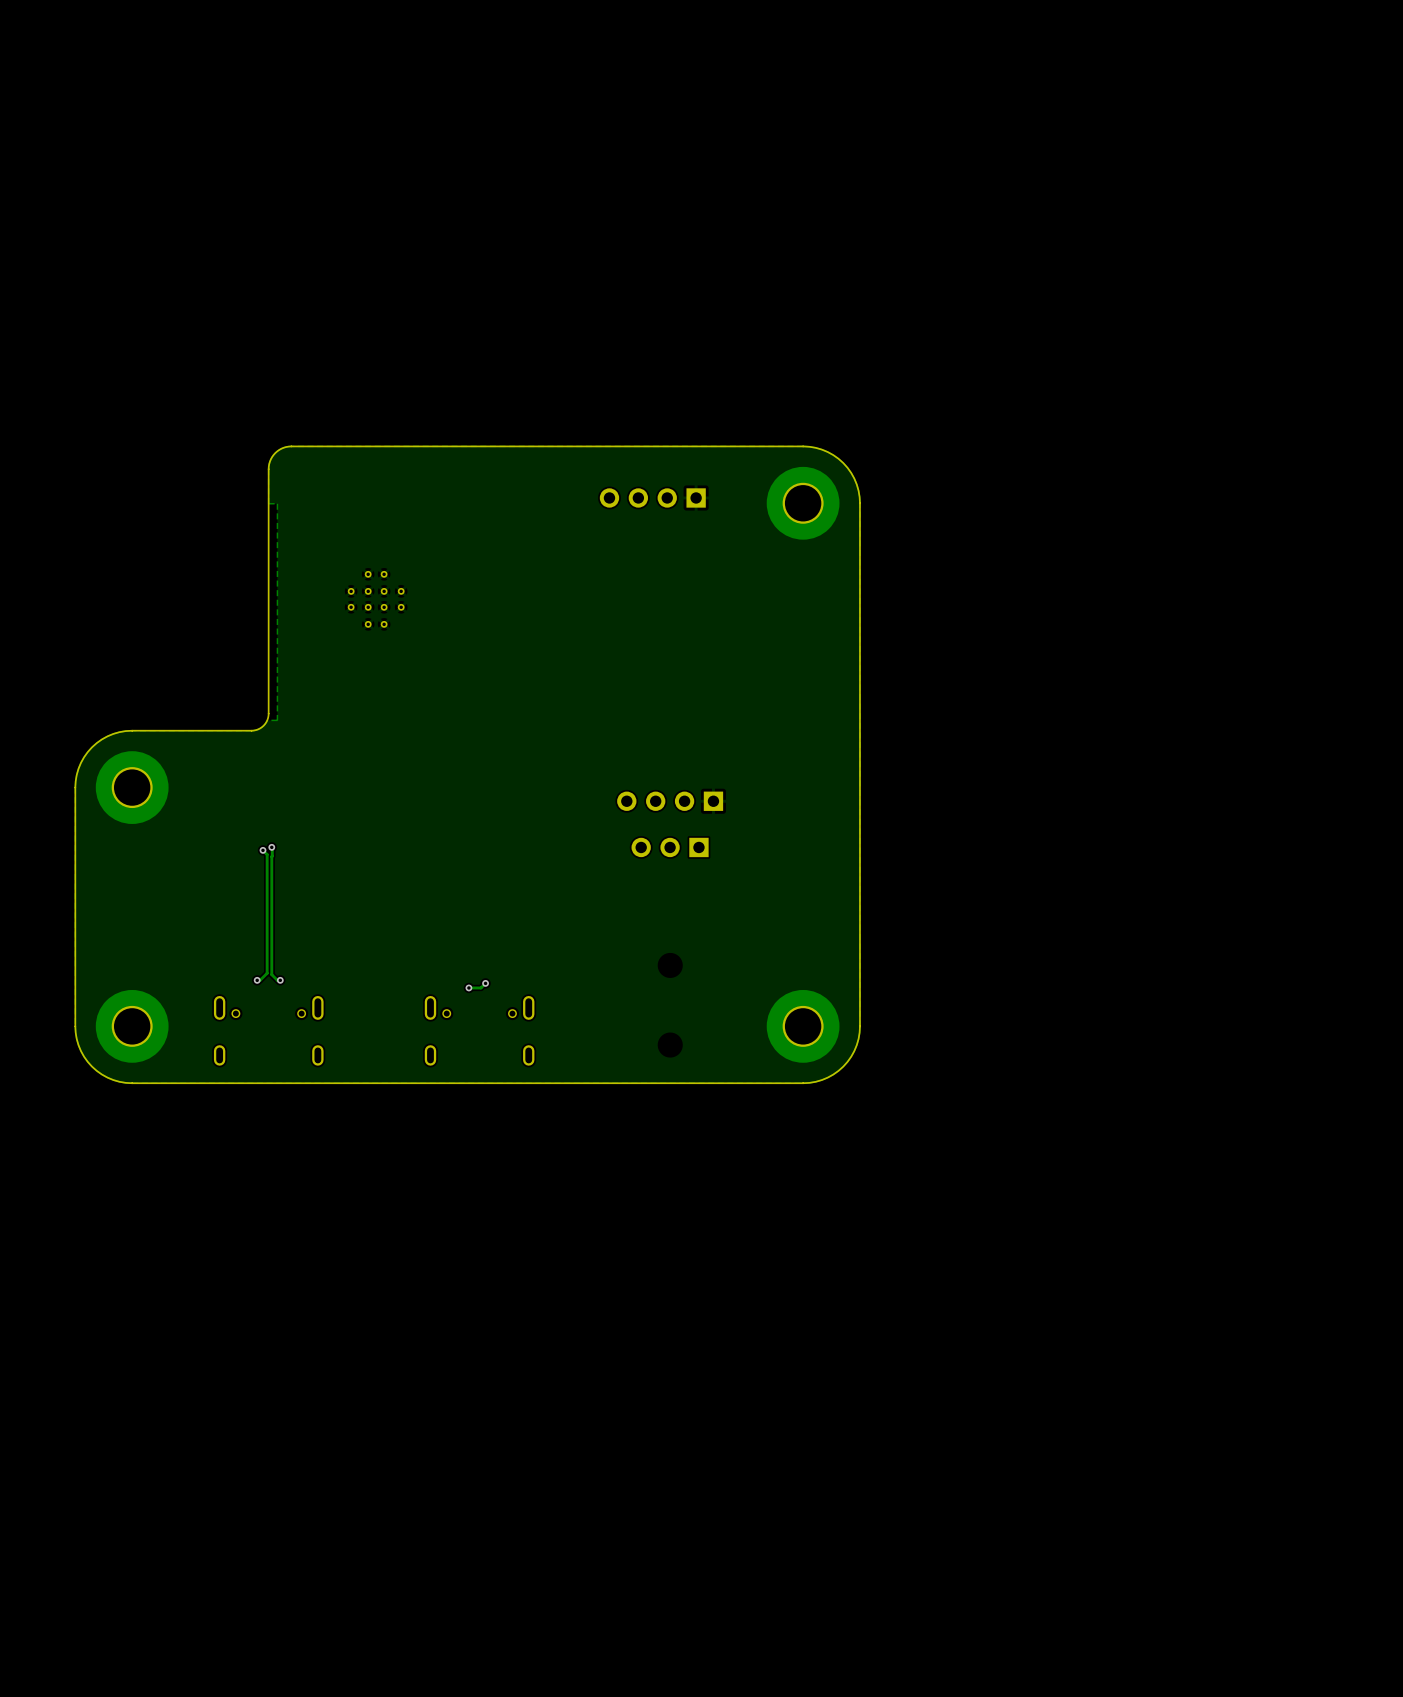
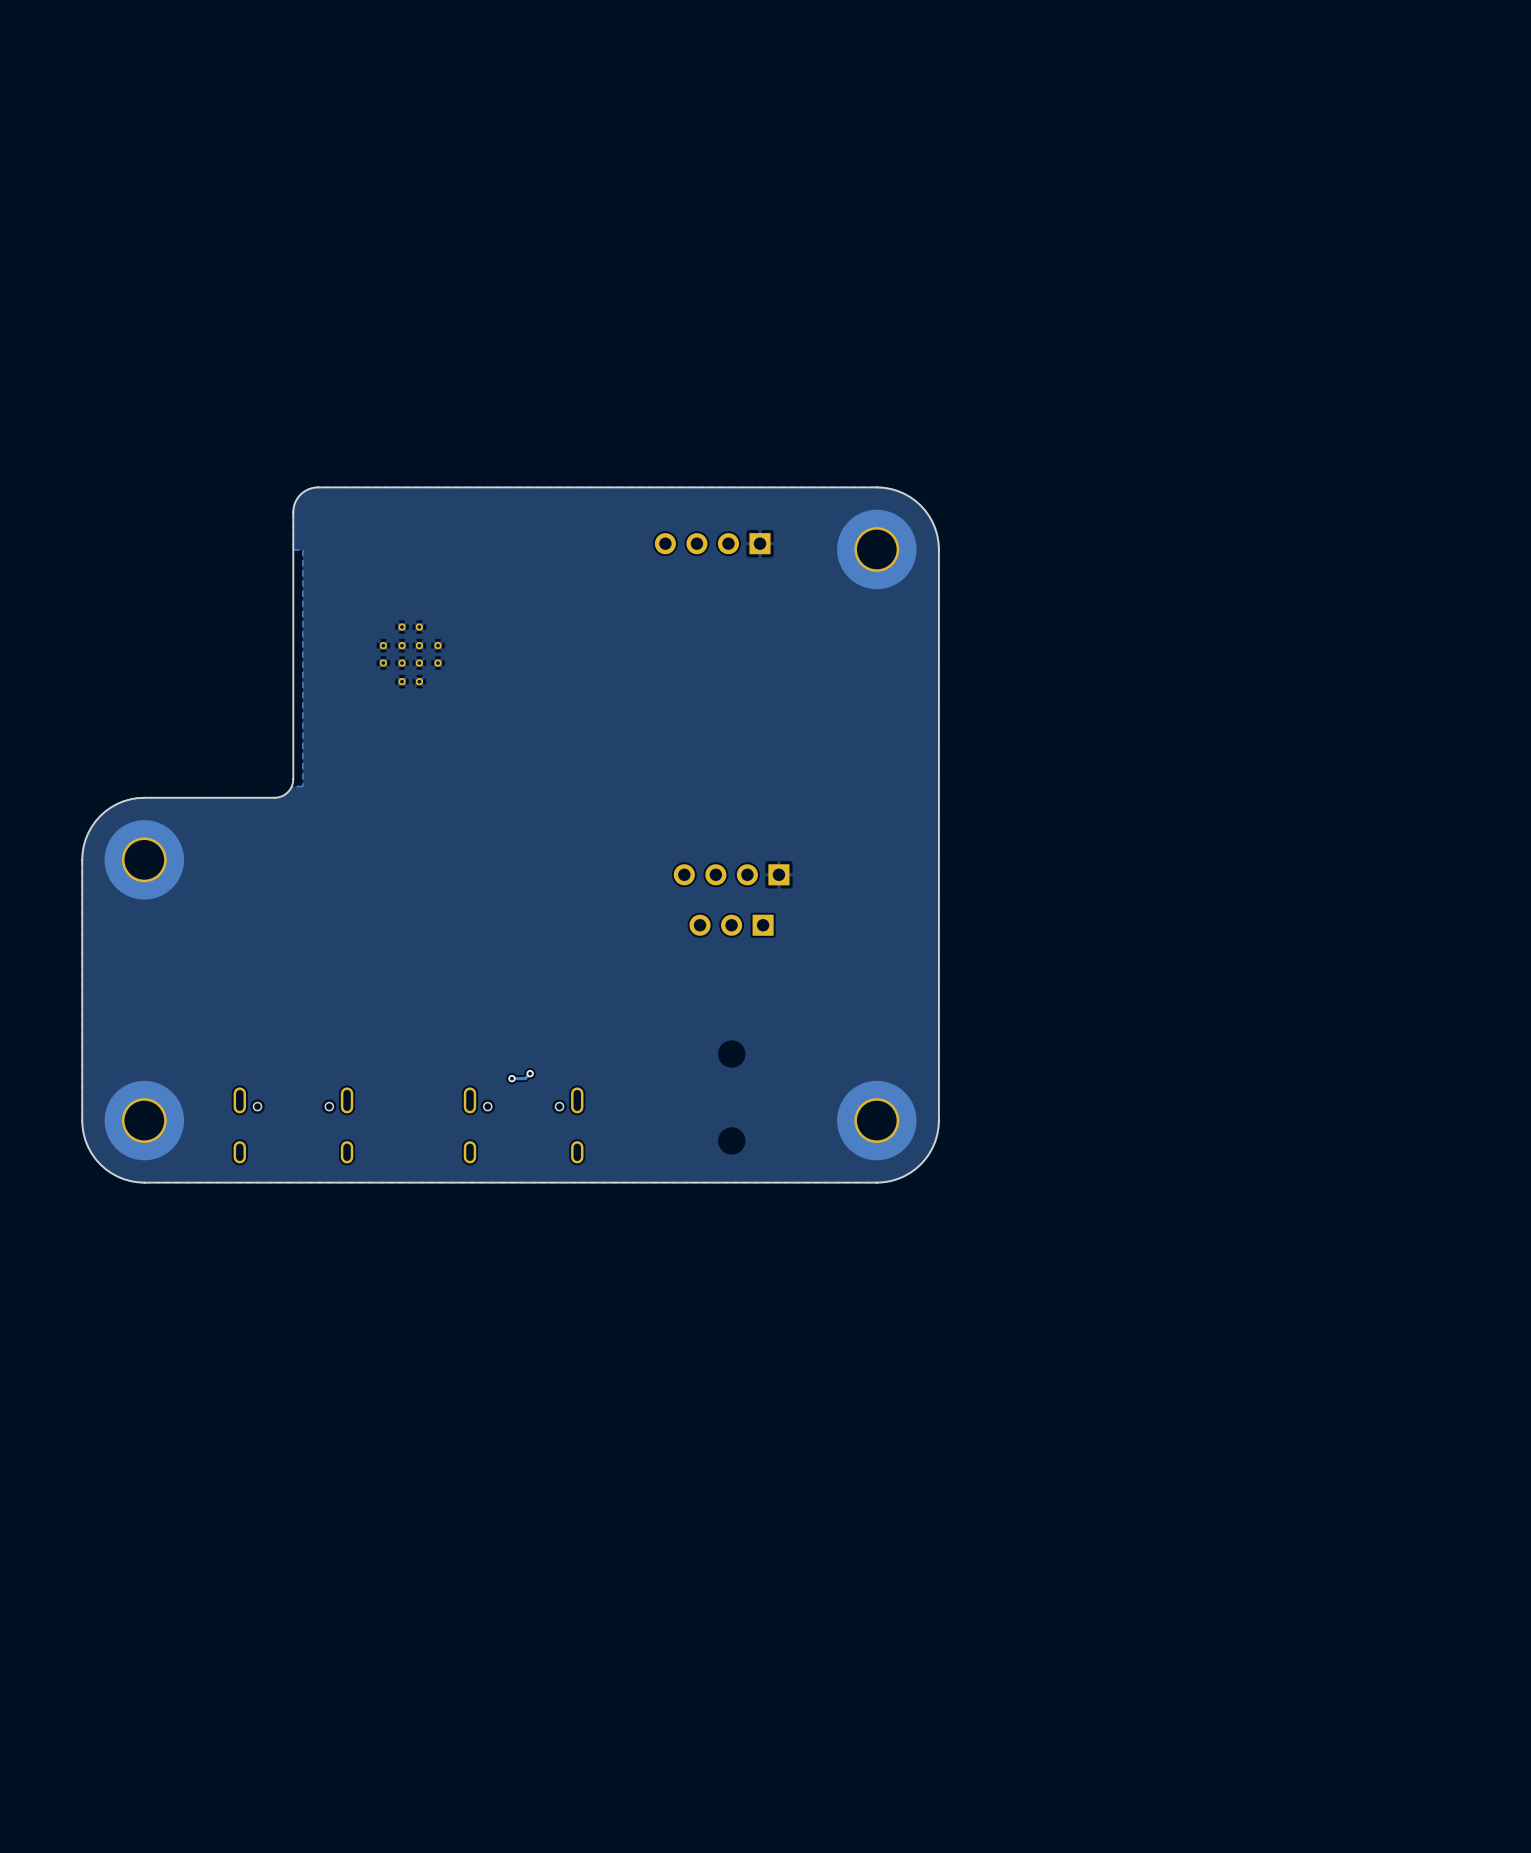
track: (271, 847) (271, 974) (277, 980) (280, 980) -> none
via: (271, 847) -> none
track: (262, 850) (267, 854) (267, 973) (260, 980) (257, 980) -> none
via: (262, 850) -> none
via: (257, 980) -> none
via: (280, 980) -> none

